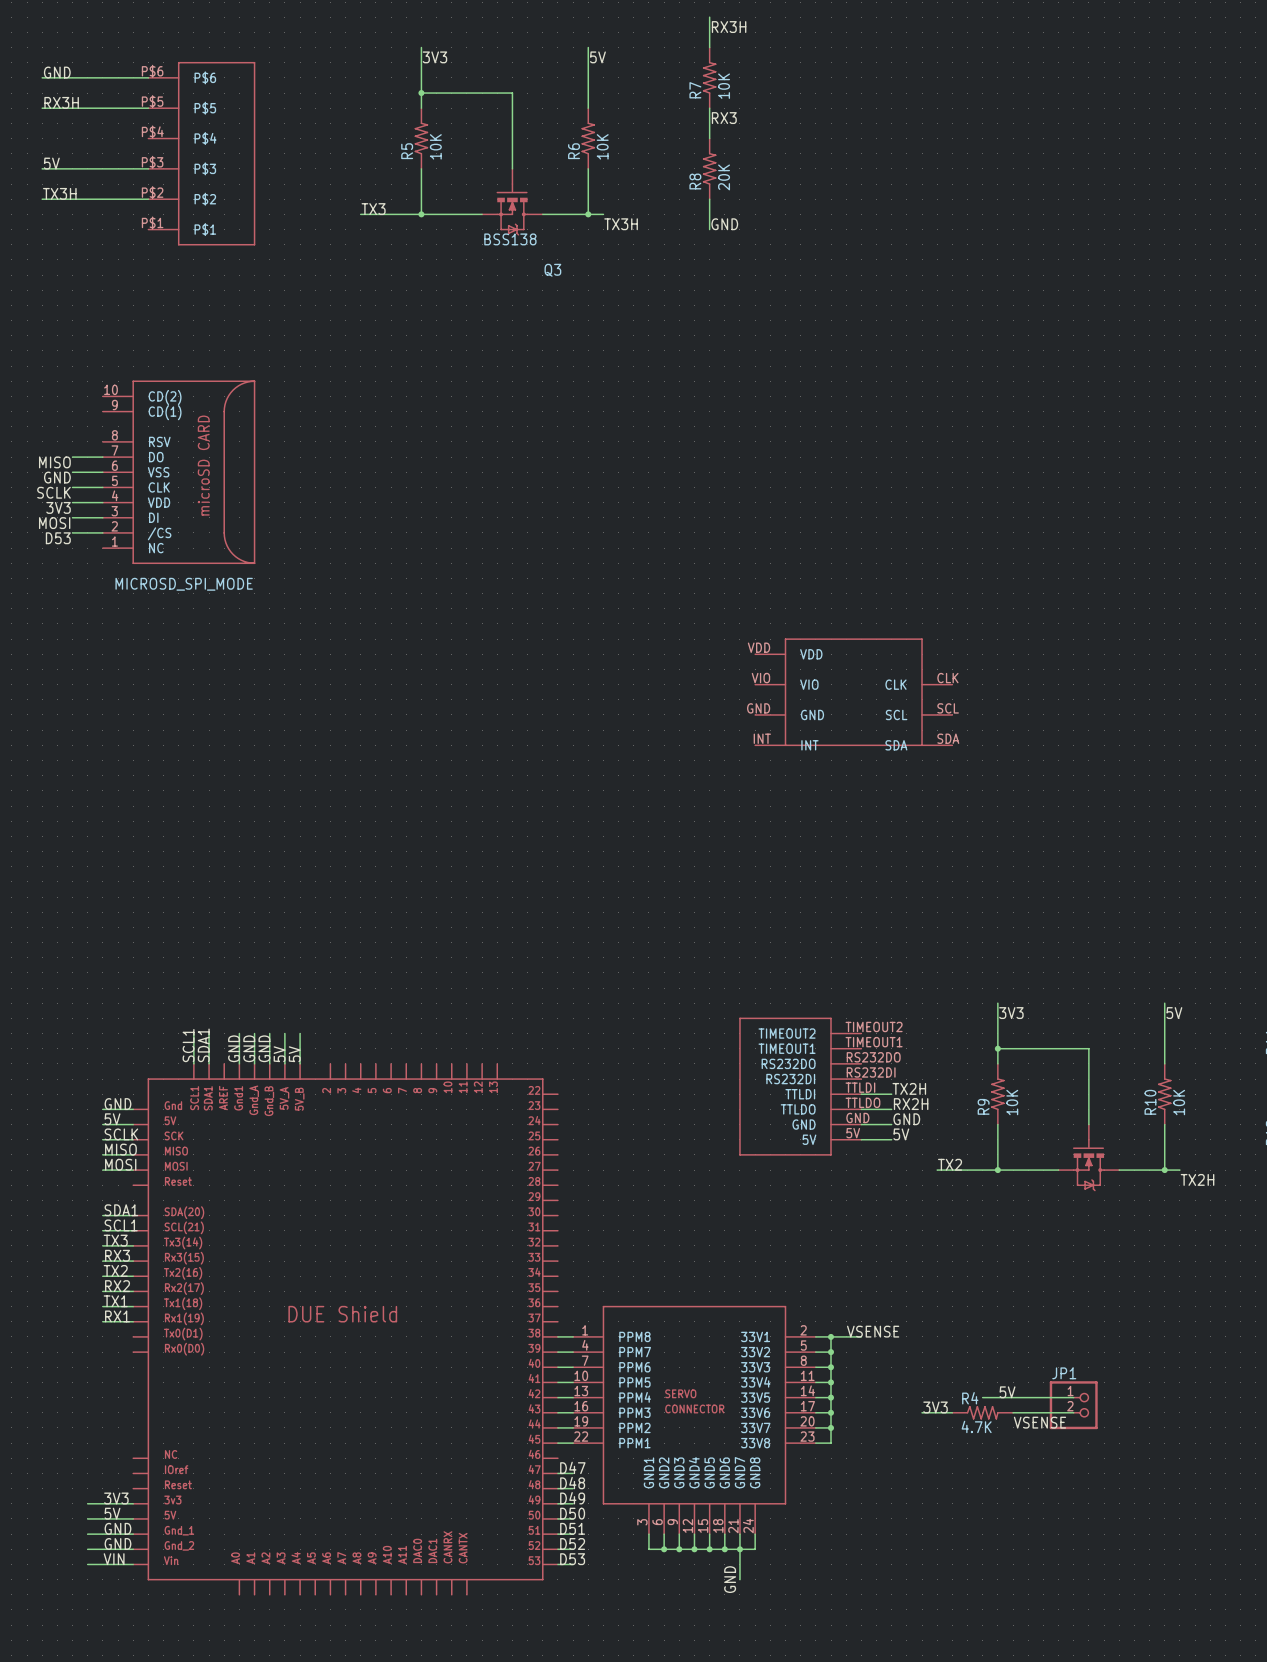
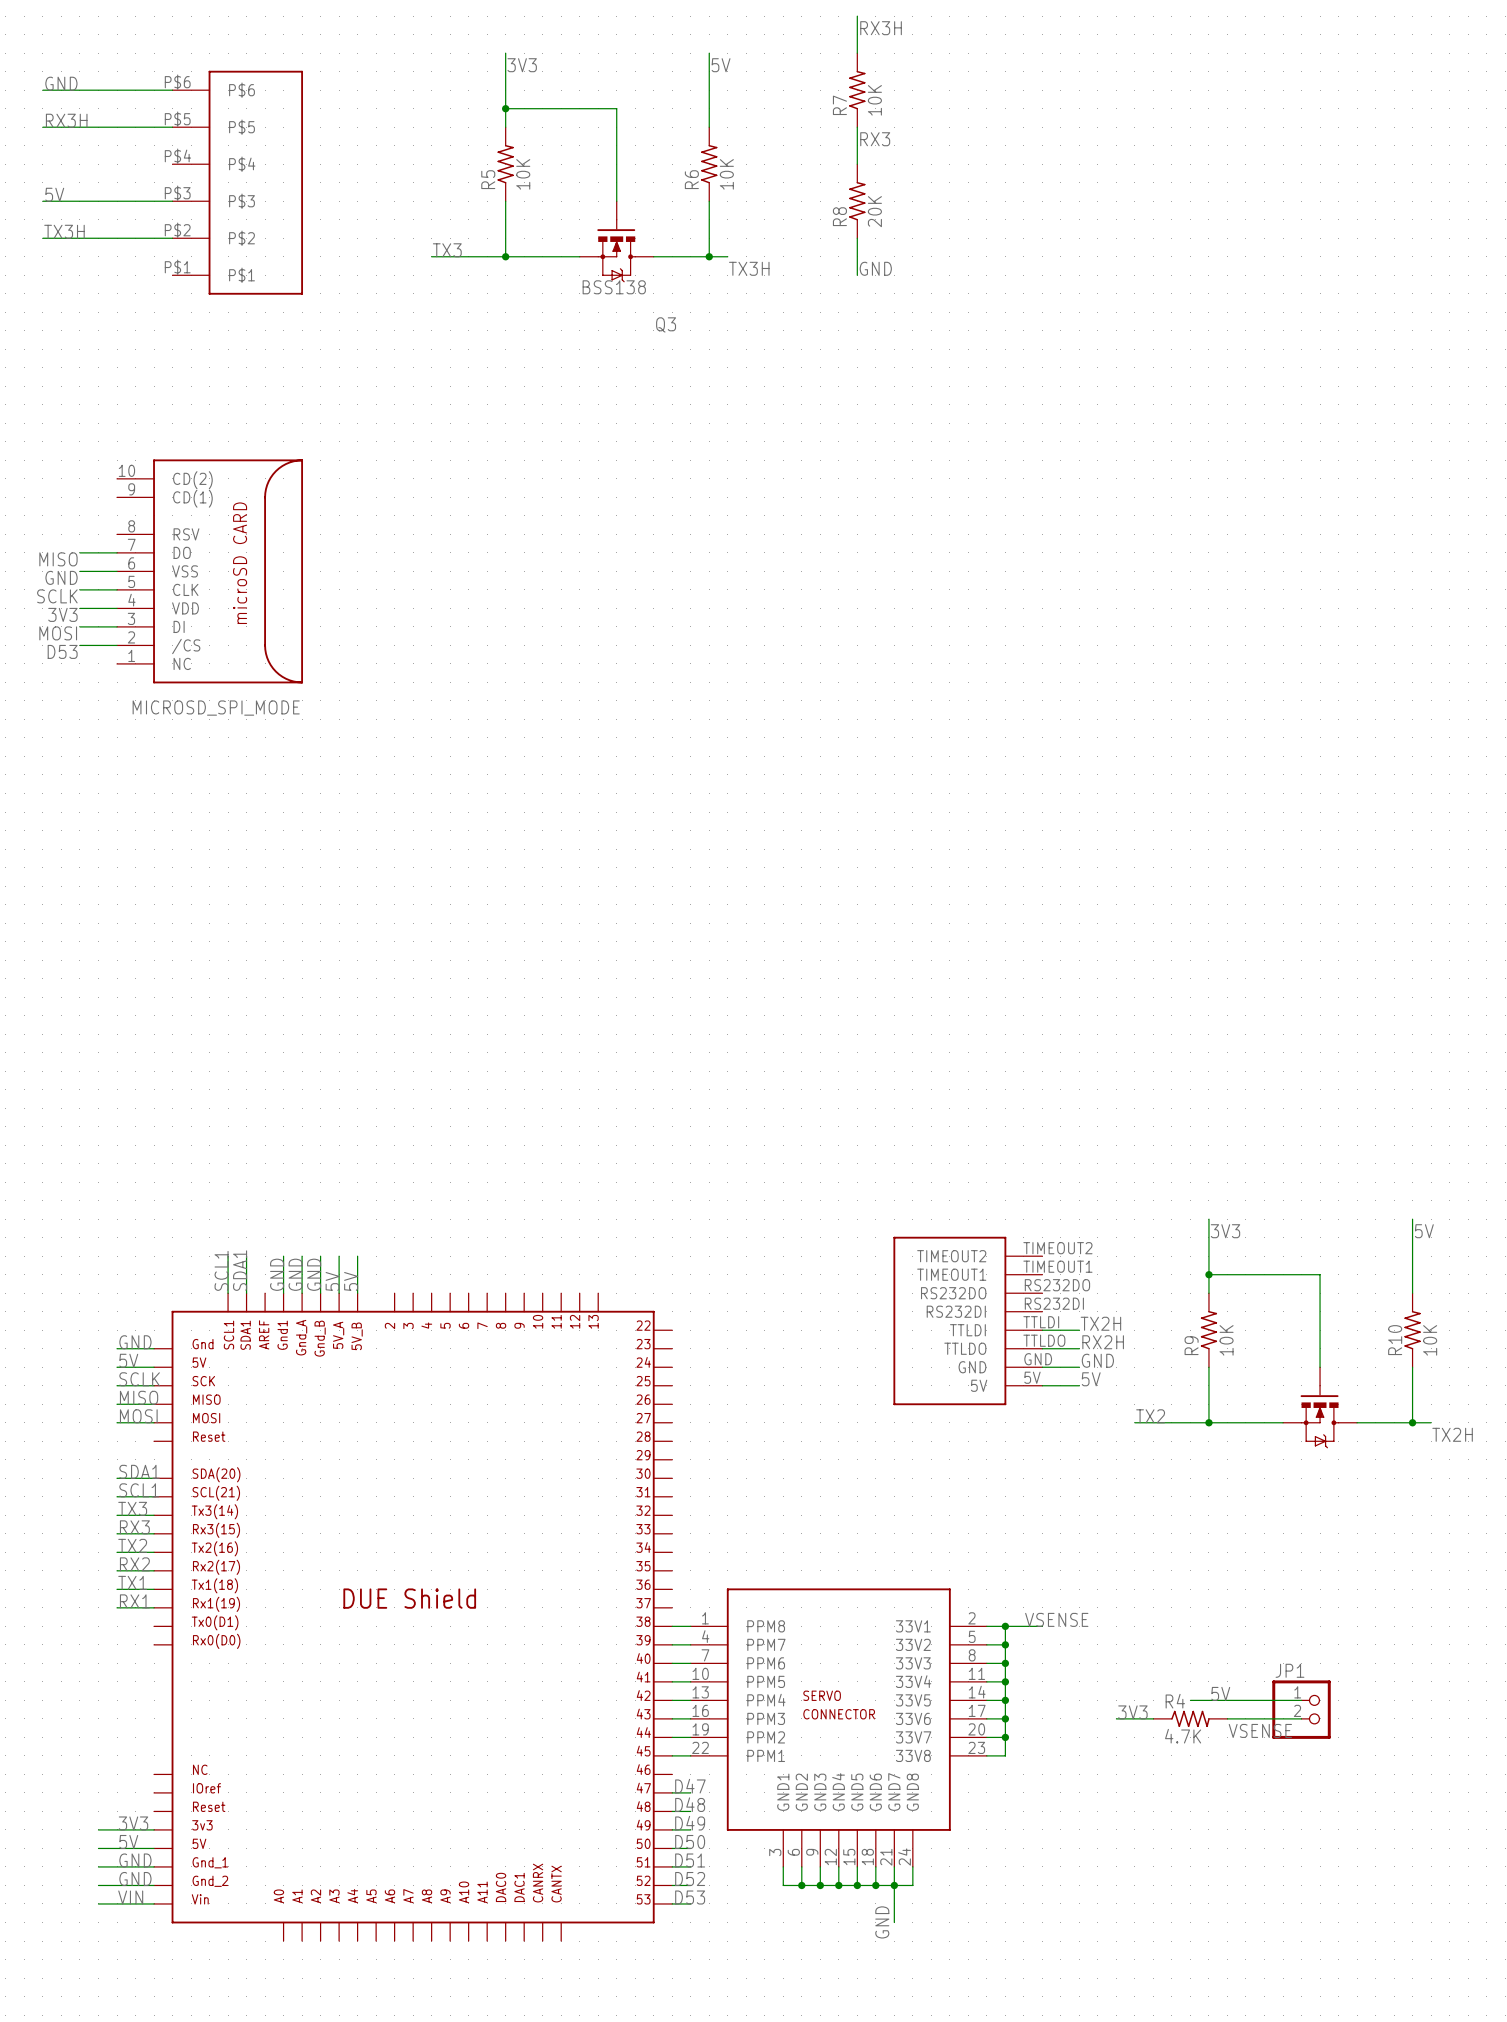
part: (853, 692) -> none

